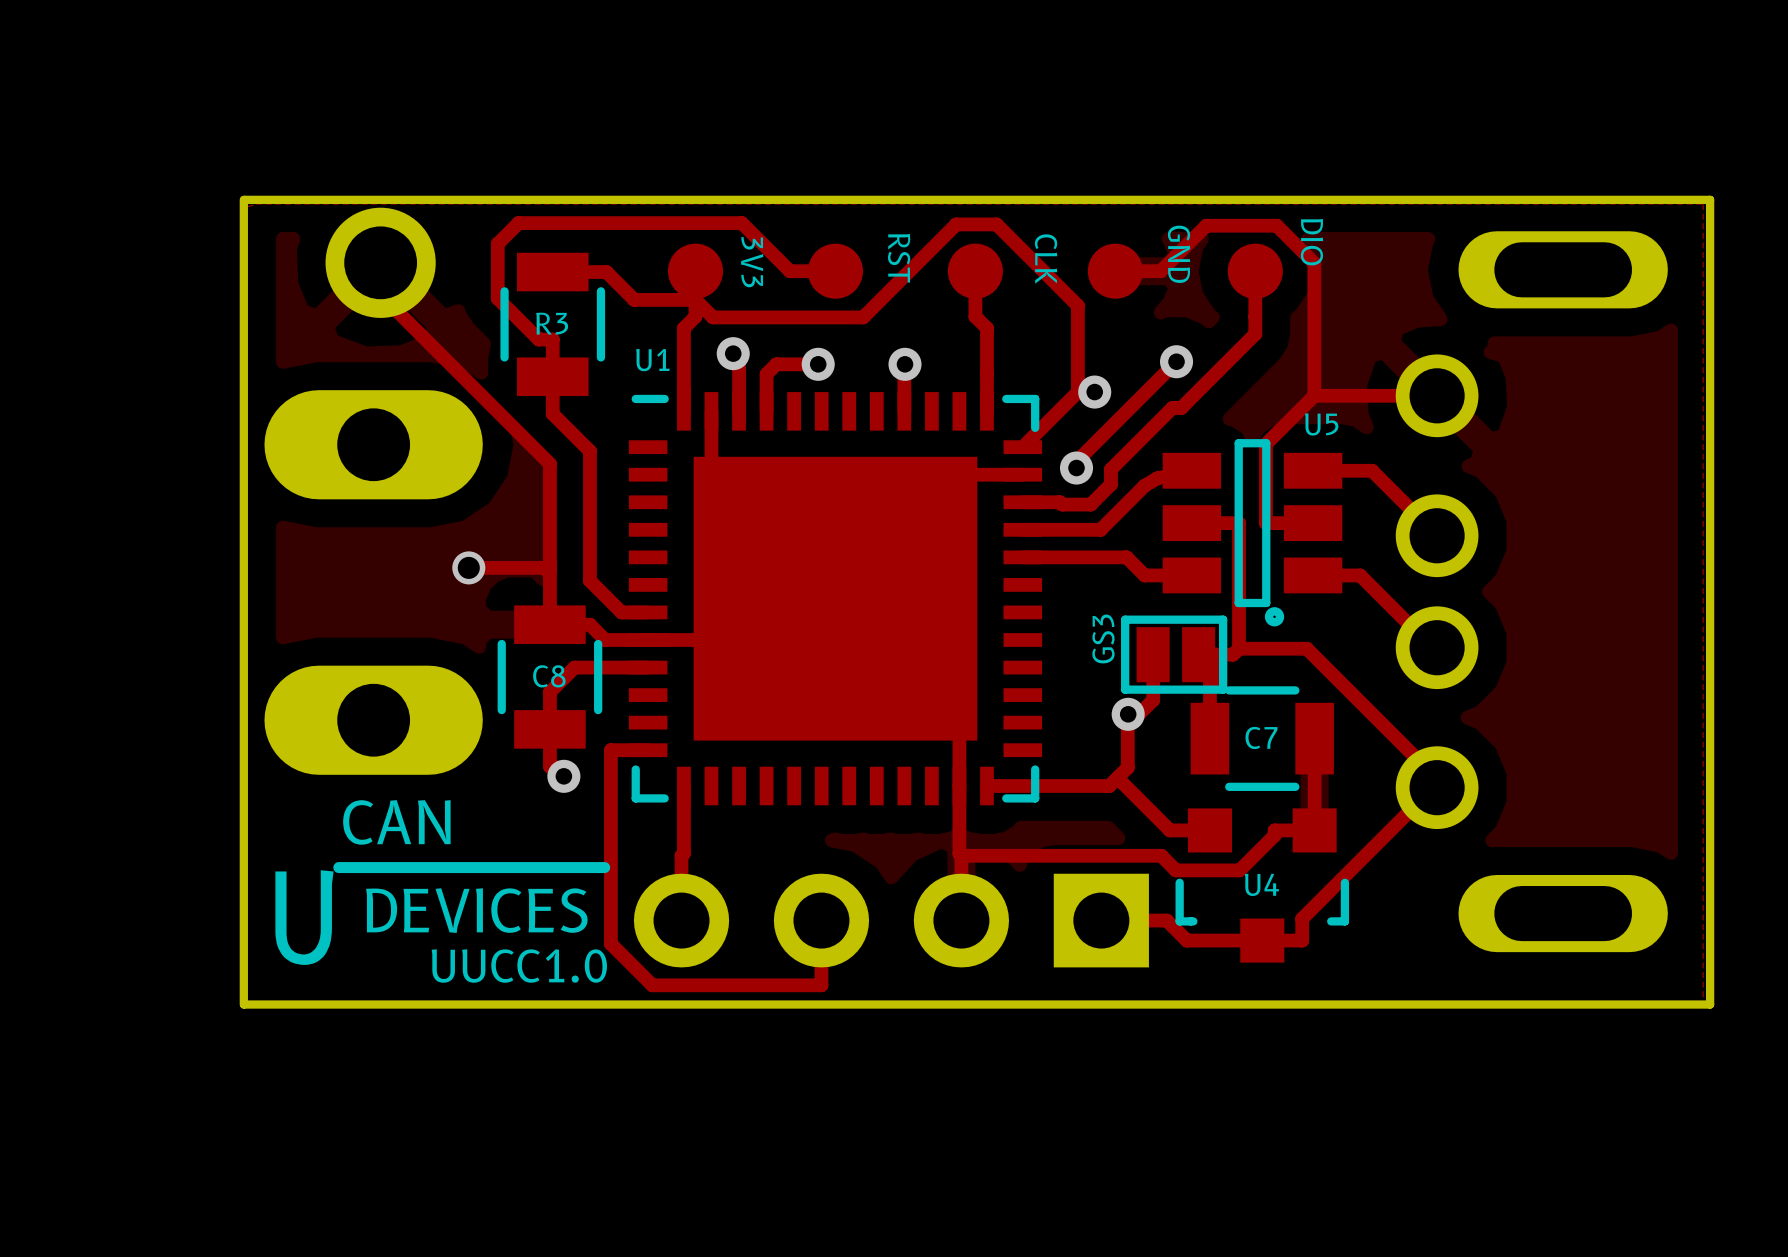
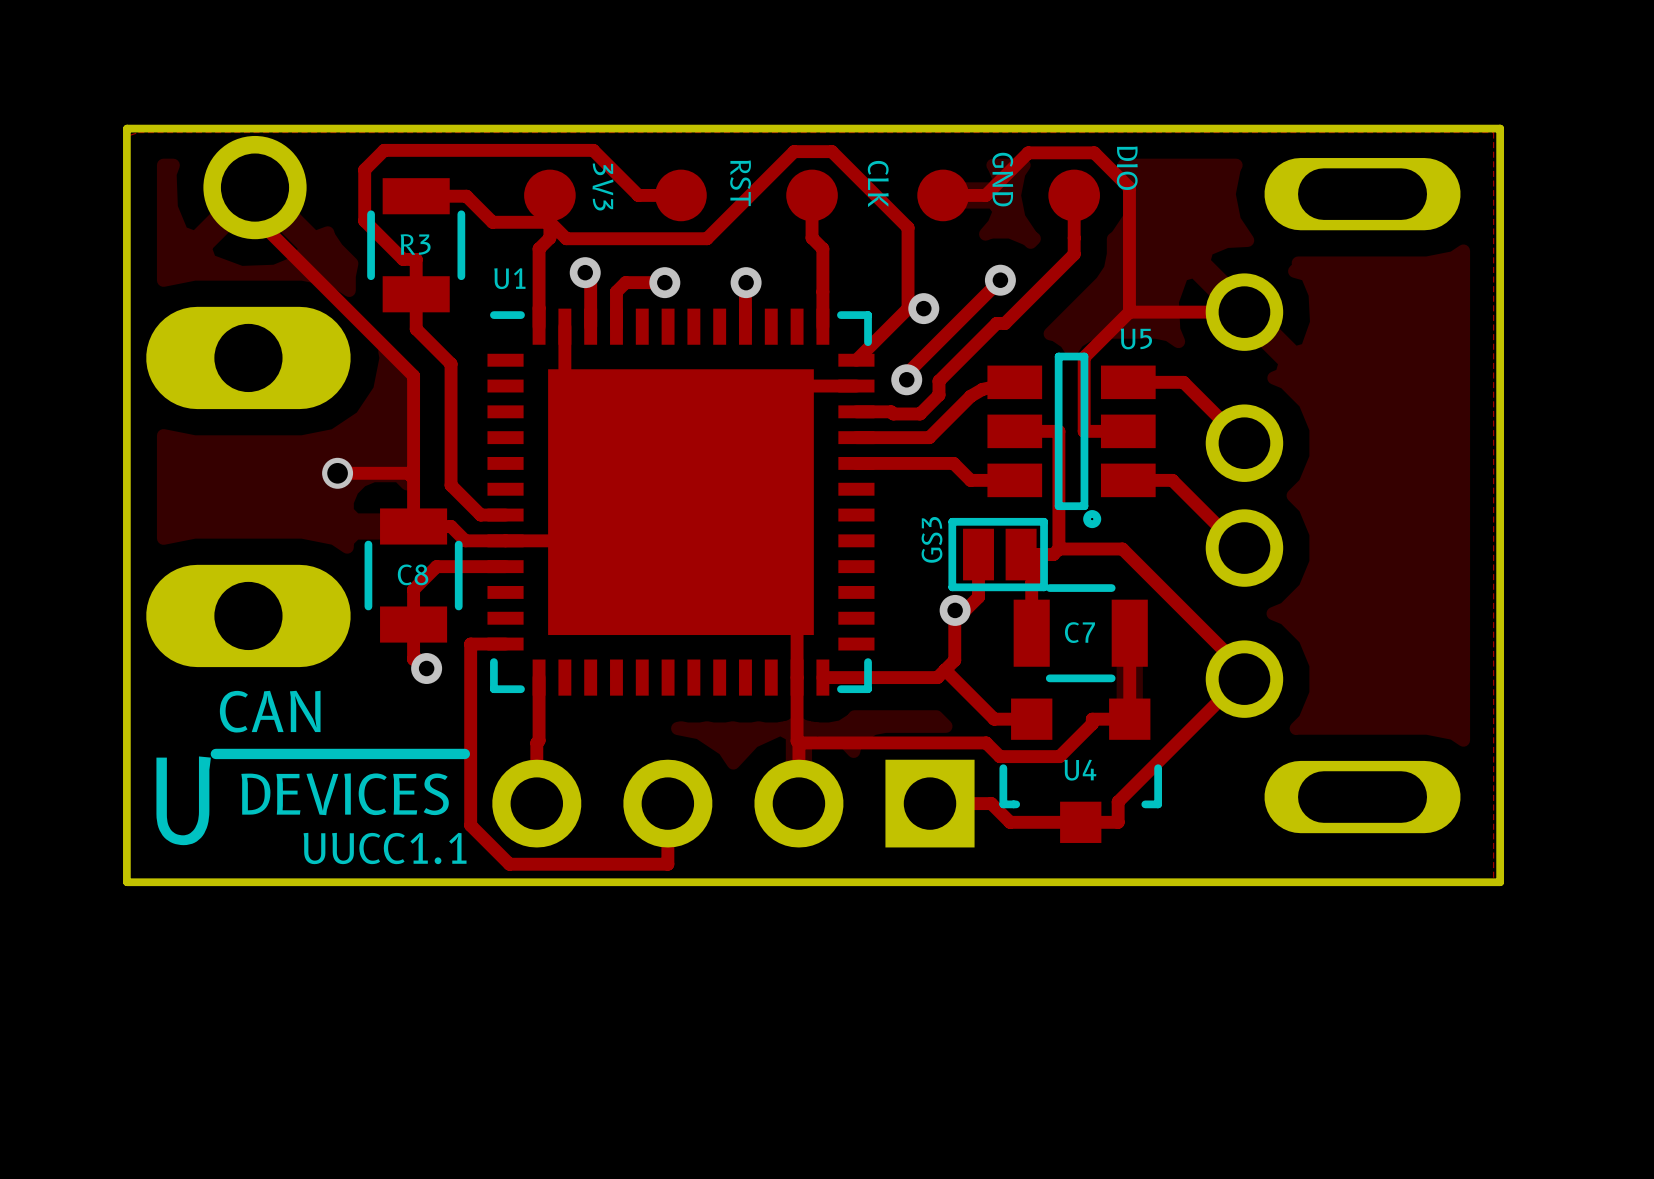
text: UUCC1.0 (519, 966) -> UUCC1.1 (385, 848)

